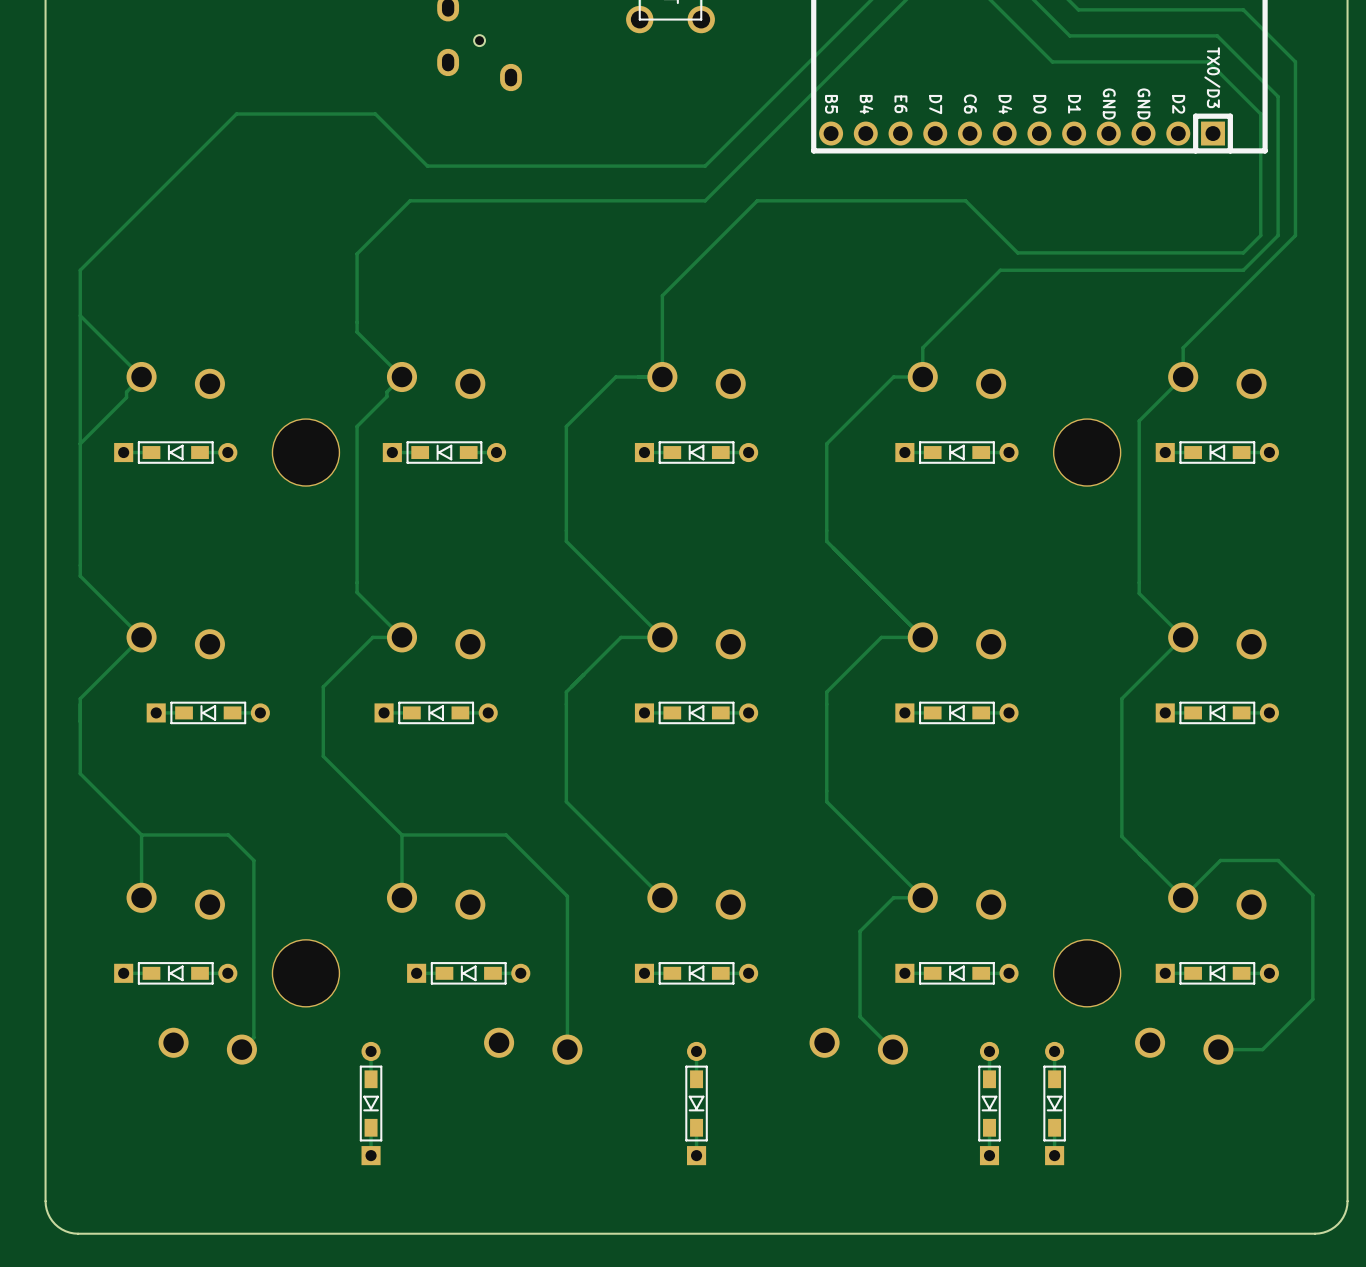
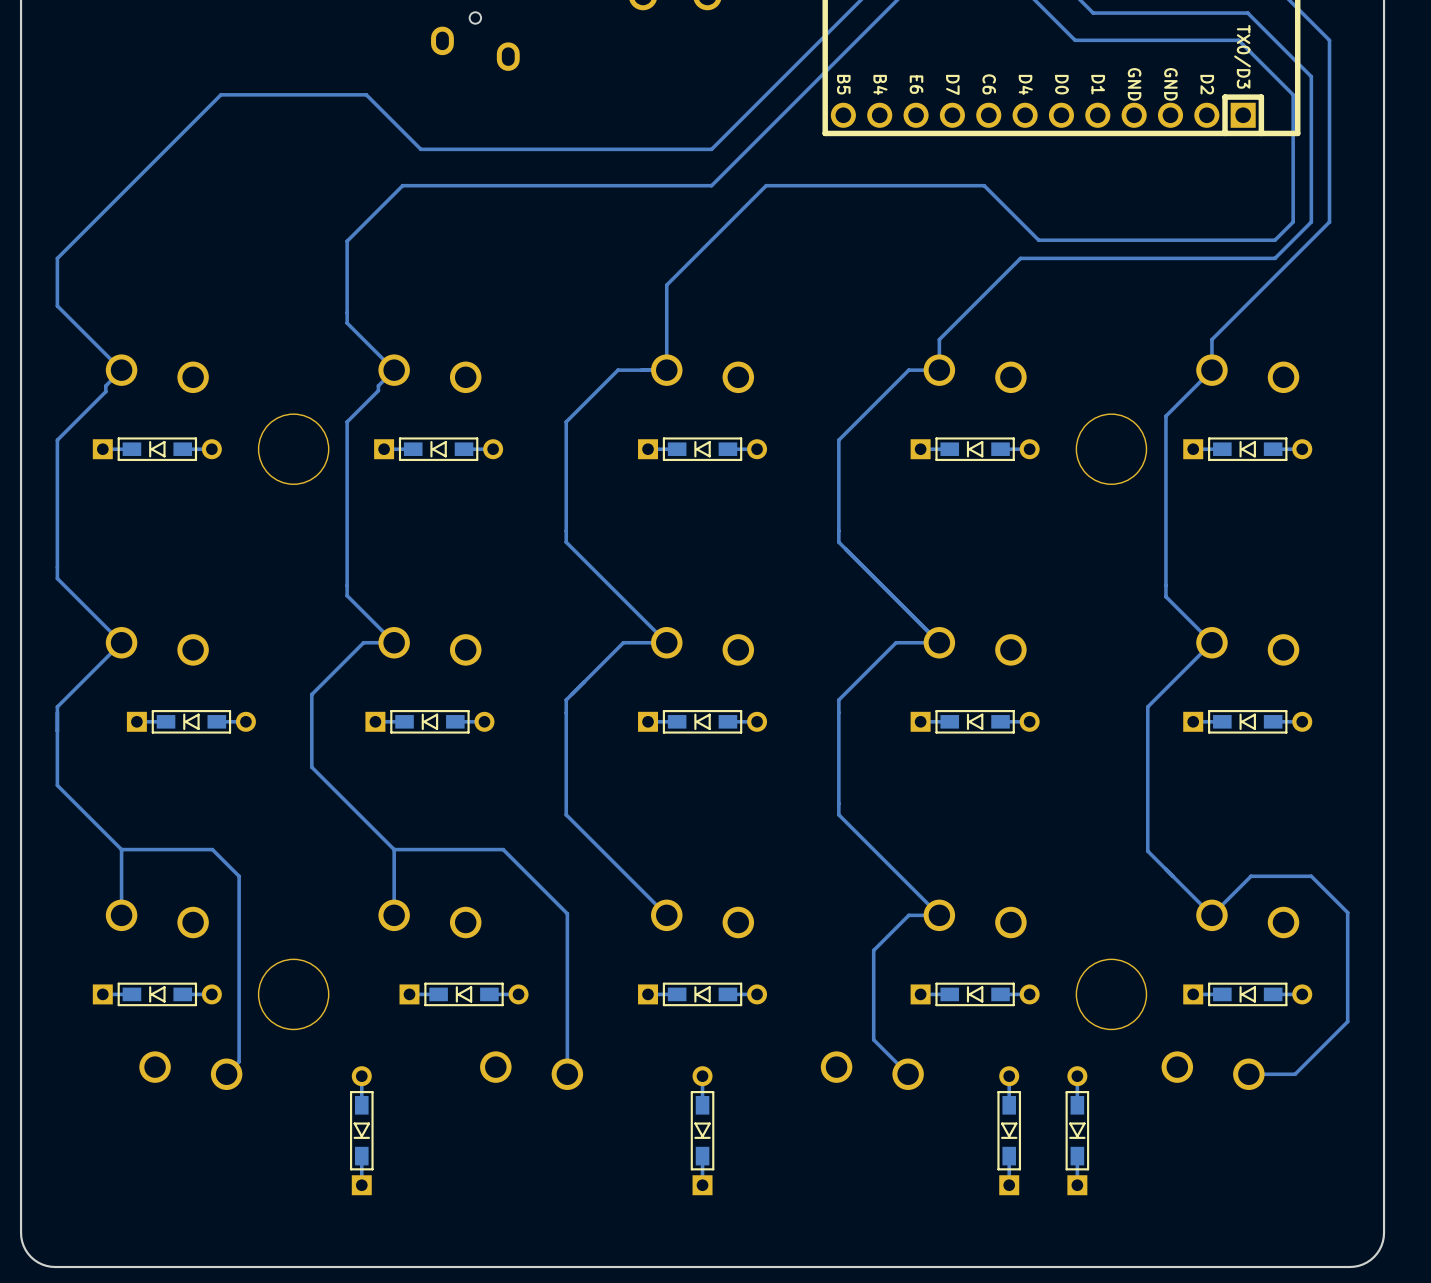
track: (80, 315) (80, 443) -> none

